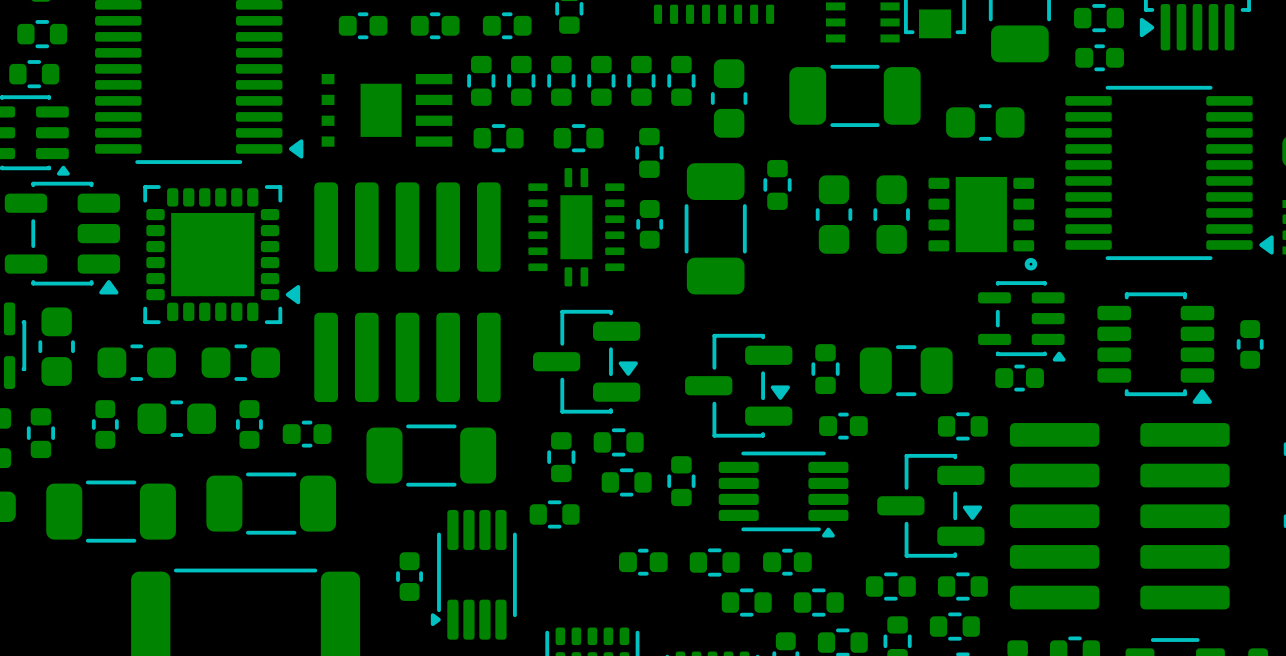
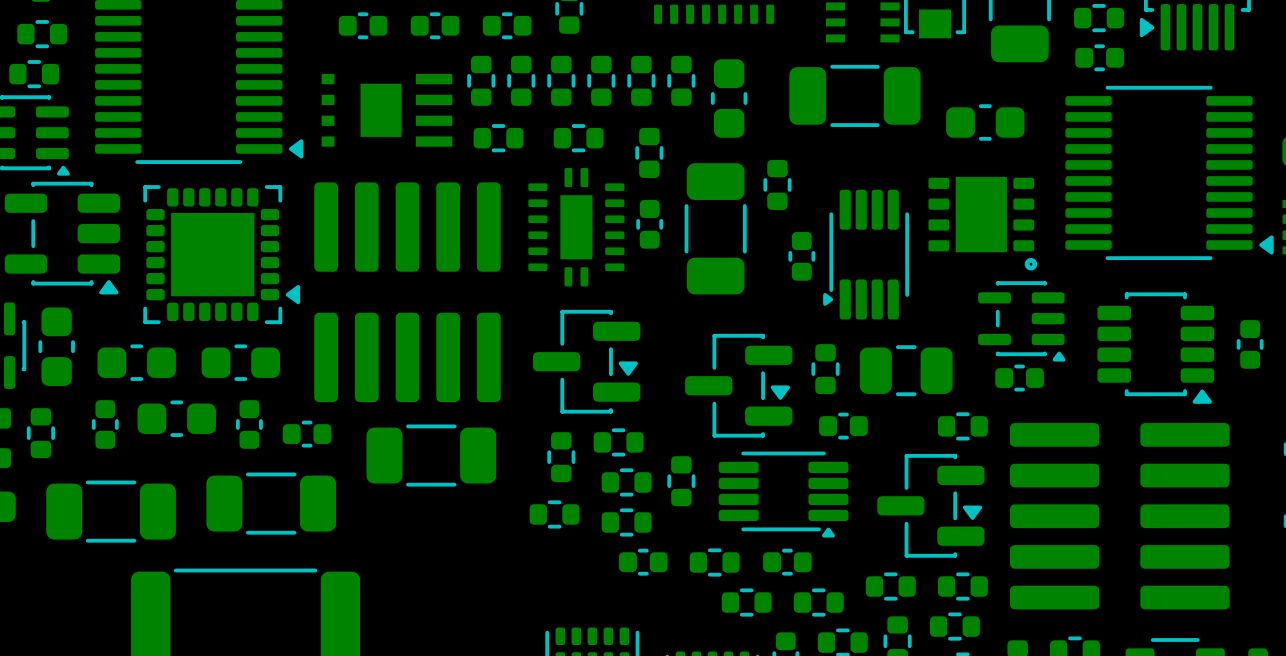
part: (834, 214) -> none
part: (891, 214) -> none
part: none -> (626, 522)
part position: (473, 574) -> (866, 254)
part position: (409, 576) -> (801, 256)

